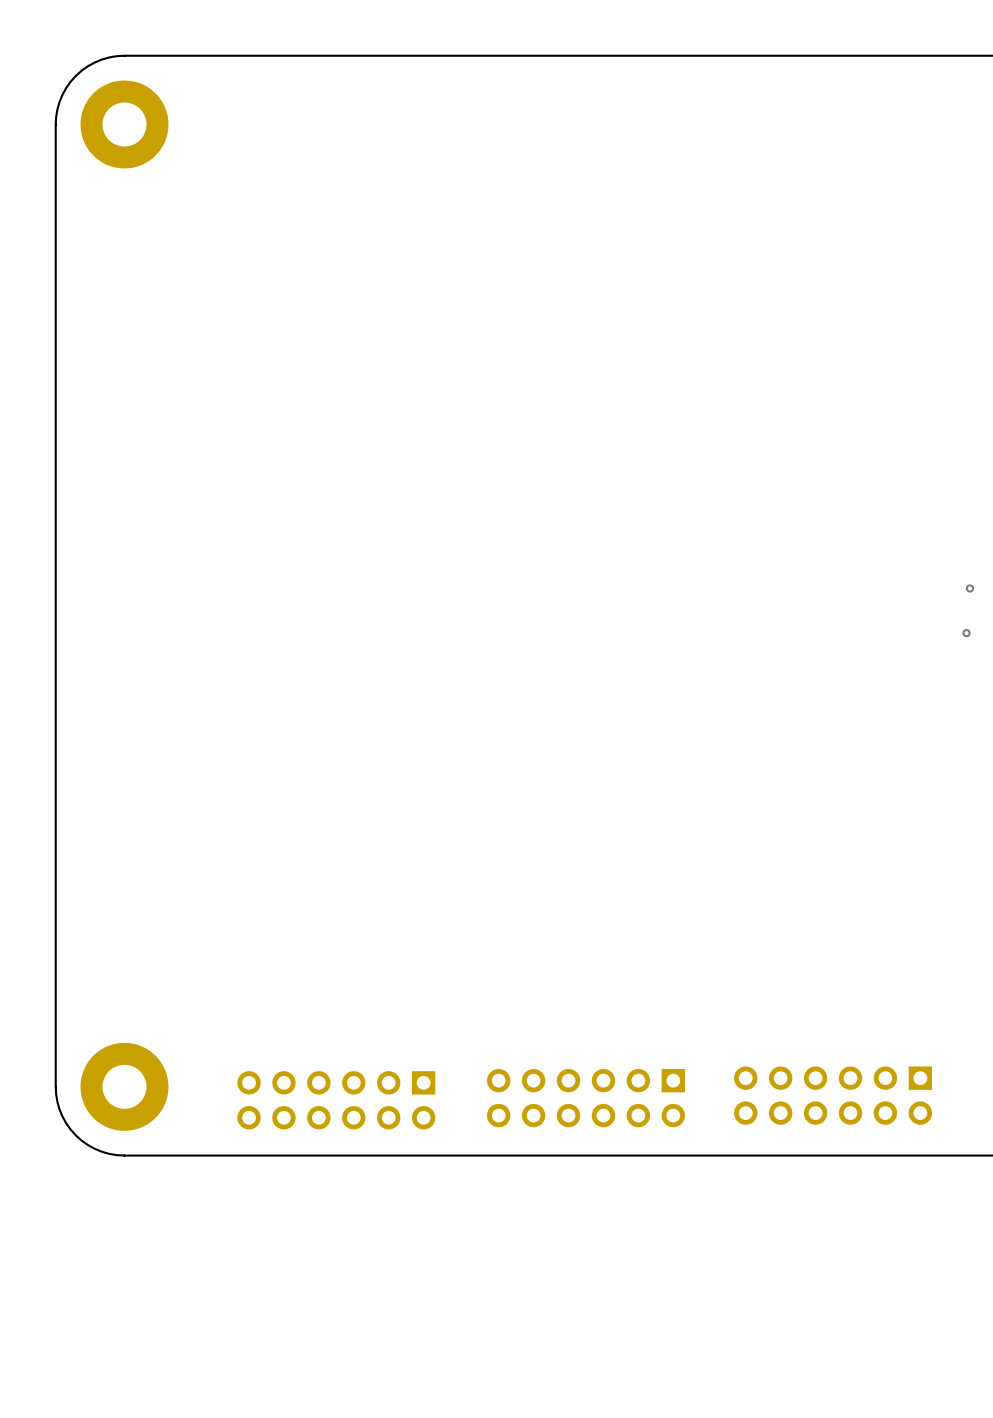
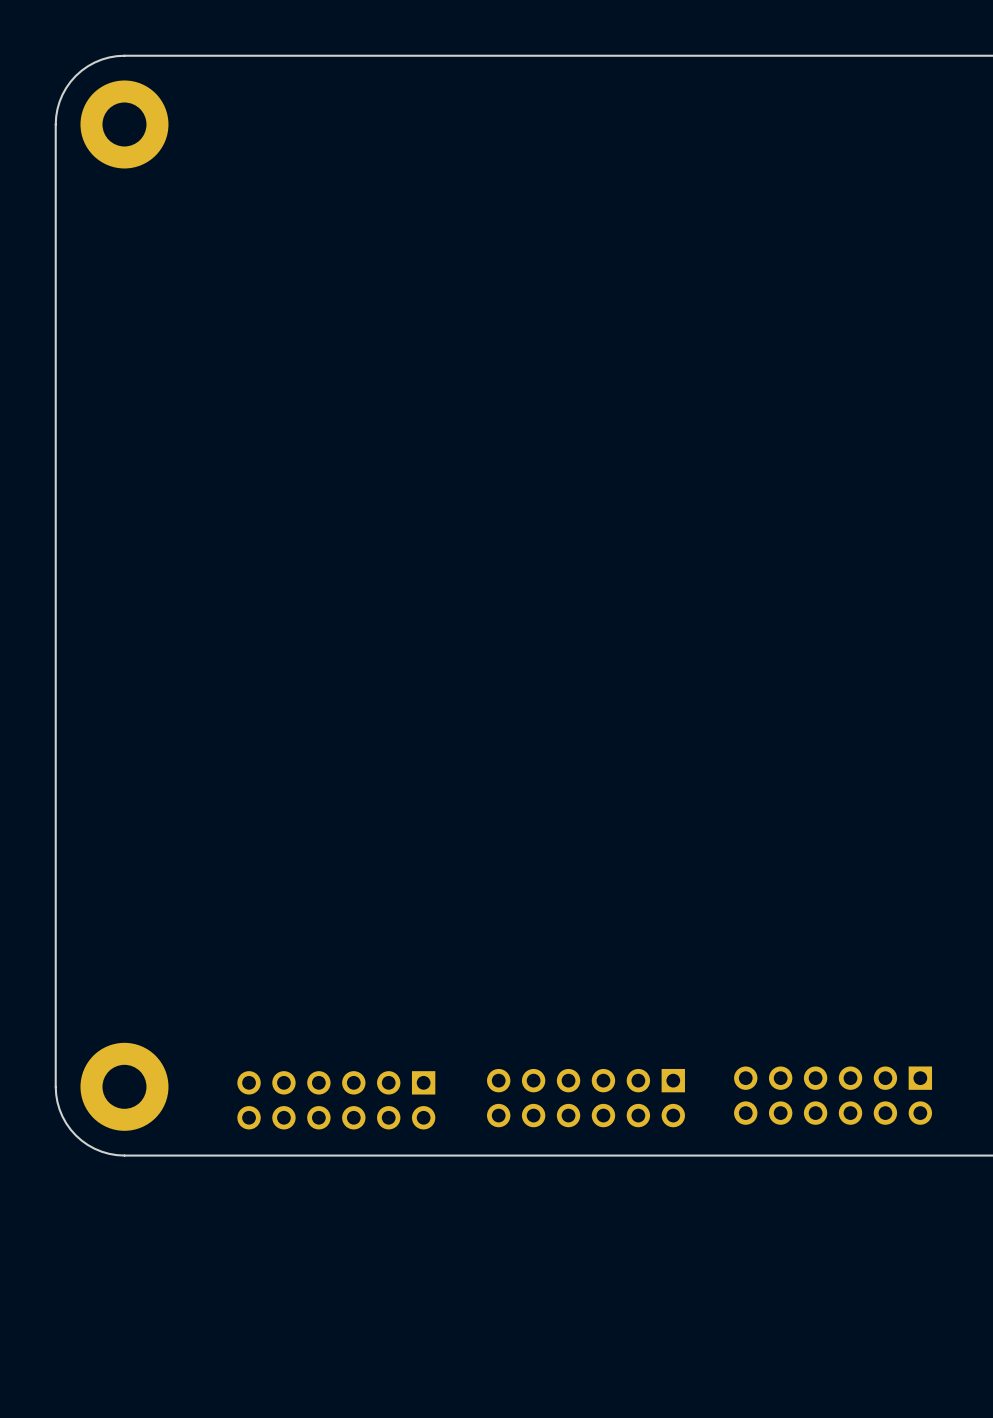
via: (969, 588) -> none
via: (966, 633) -> none

